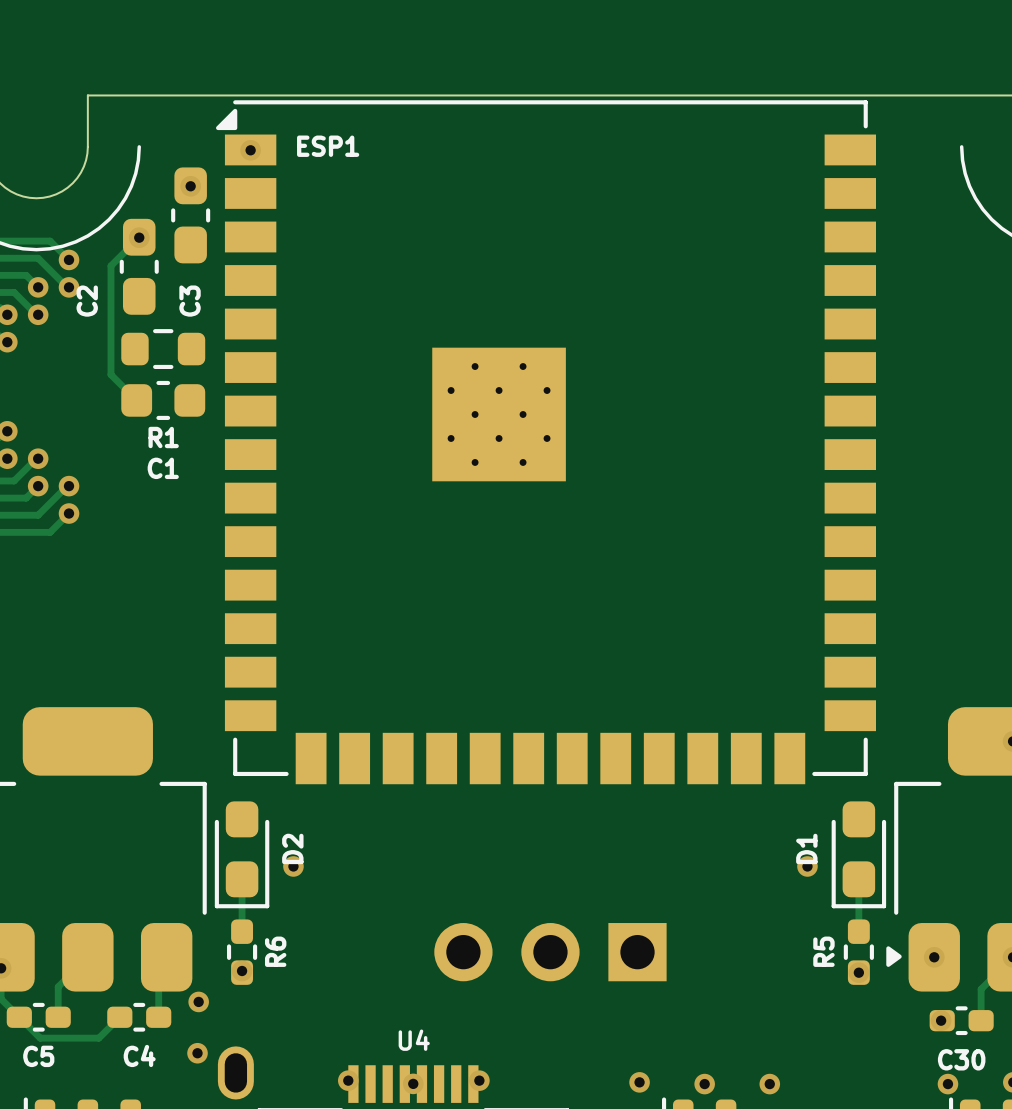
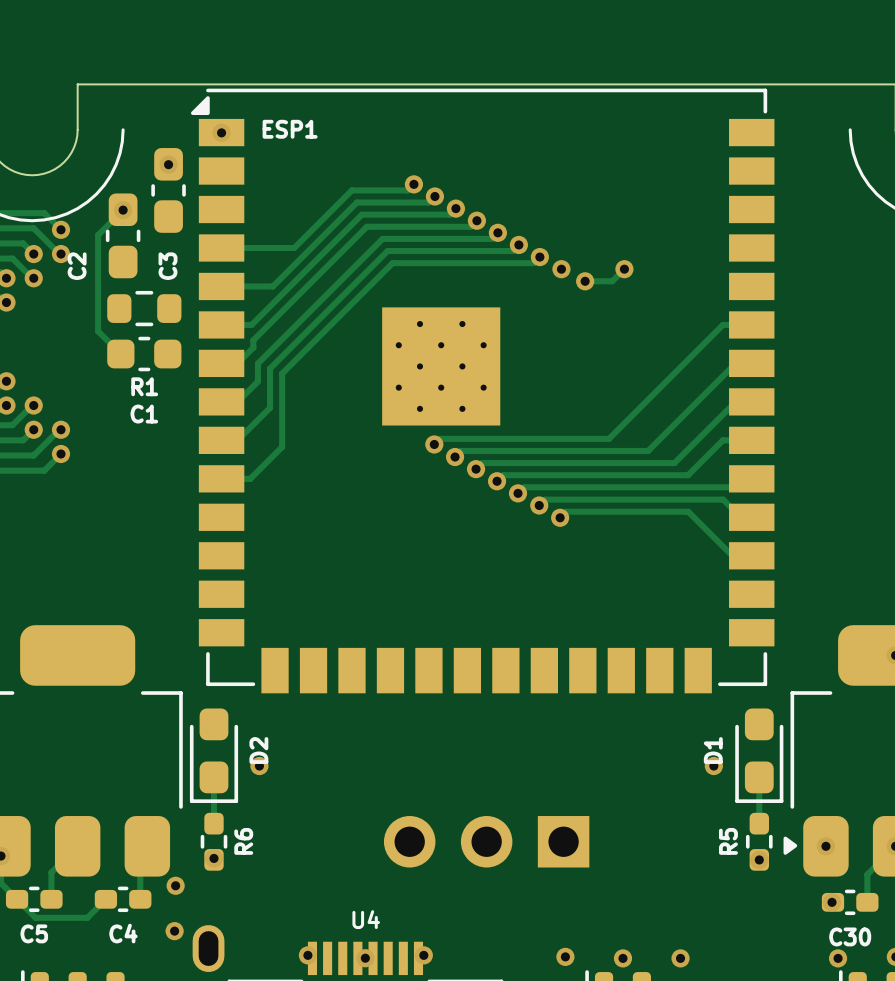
track: none -> (413, 184) (407, 190) (351, 190) (294, 247) (221, 247)
via: none -> (413, 184)
track: none -> (434, 196) (428, 202) (356, 202) (272, 286) (221, 286)
via: none -> (434, 196)
track: none -> (455, 208) (449, 214) (361, 214) (251, 324) (221, 324)
via: none -> (455, 208)
track: none -> (476, 220) (470, 226) (366, 226) (253, 340) (253, 347) (237, 363) (221, 363)
via: none -> (476, 220)
track: none -> (497, 232) (491, 238) (382, 238) (257, 363) (257, 381) (237, 401) (221, 401)
via: none -> (497, 232)
track: none -> (518, 244) (512, 251) (387, 251) (270, 368) (270, 407) (237, 440) (221, 440)
via: none -> (518, 244)
track: none -> (539, 257) (533, 263) (392, 263) (282, 373) (282, 447) (250, 478) (221, 478)
via: none -> (539, 257)
via: none -> (561, 269)
track: none -> (624, 269) (612, 281) (585, 281)
via: none -> (624, 269)
via: none -> (585, 281)
track: none -> (751, 324) (722, 324) (609, 438) (439, 438) (434, 444)
track: none -> (751, 363) (735, 363) (648, 450) (461, 450) (455, 457)
track: none -> (751, 401) (735, 401) (674, 463) (482, 463) (476, 469)
track: none -> (751, 440) (722, 440) (688, 475) (503, 475) (497, 481)
via: none -> (434, 444)
via: none -> (455, 457)
via: none -> (476, 469)
track: none -> (751, 478) (743, 487) (524, 487) (518, 493)
via: none -> (497, 481)
via: none -> (518, 493)
track: none -> (539, 505) (545, 499) (723, 499) (740, 517) (751, 517)
via: none -> (539, 505)
track: none -> (560, 517) (566, 511) (688, 511) (732, 555) (751, 555)
via: none -> (560, 517)

